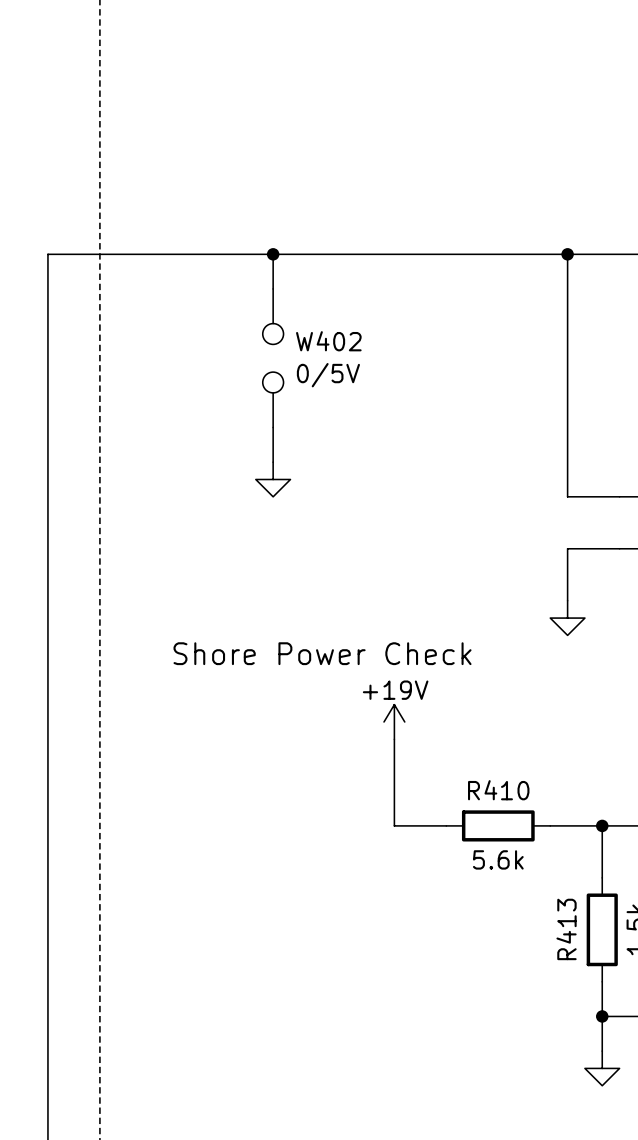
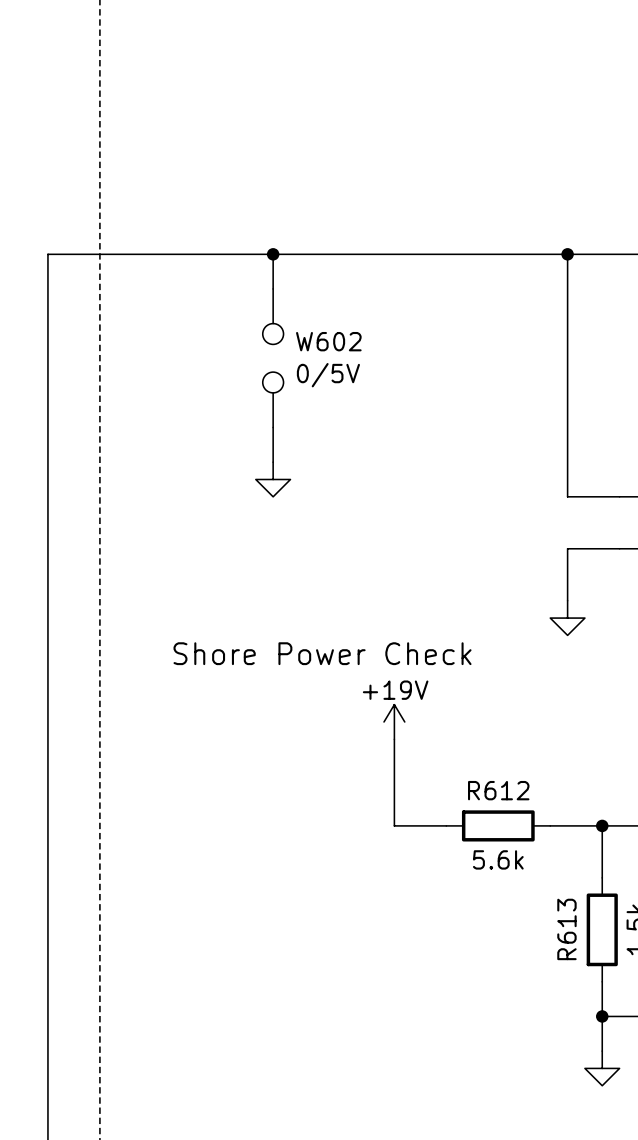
W402 name: W402 (328, 341) -> W602 (328, 341)
R410 name: R410 (498, 790) -> R612 (498, 790)
R413 name: R413 (566, 929) -> R613 (566, 929)

